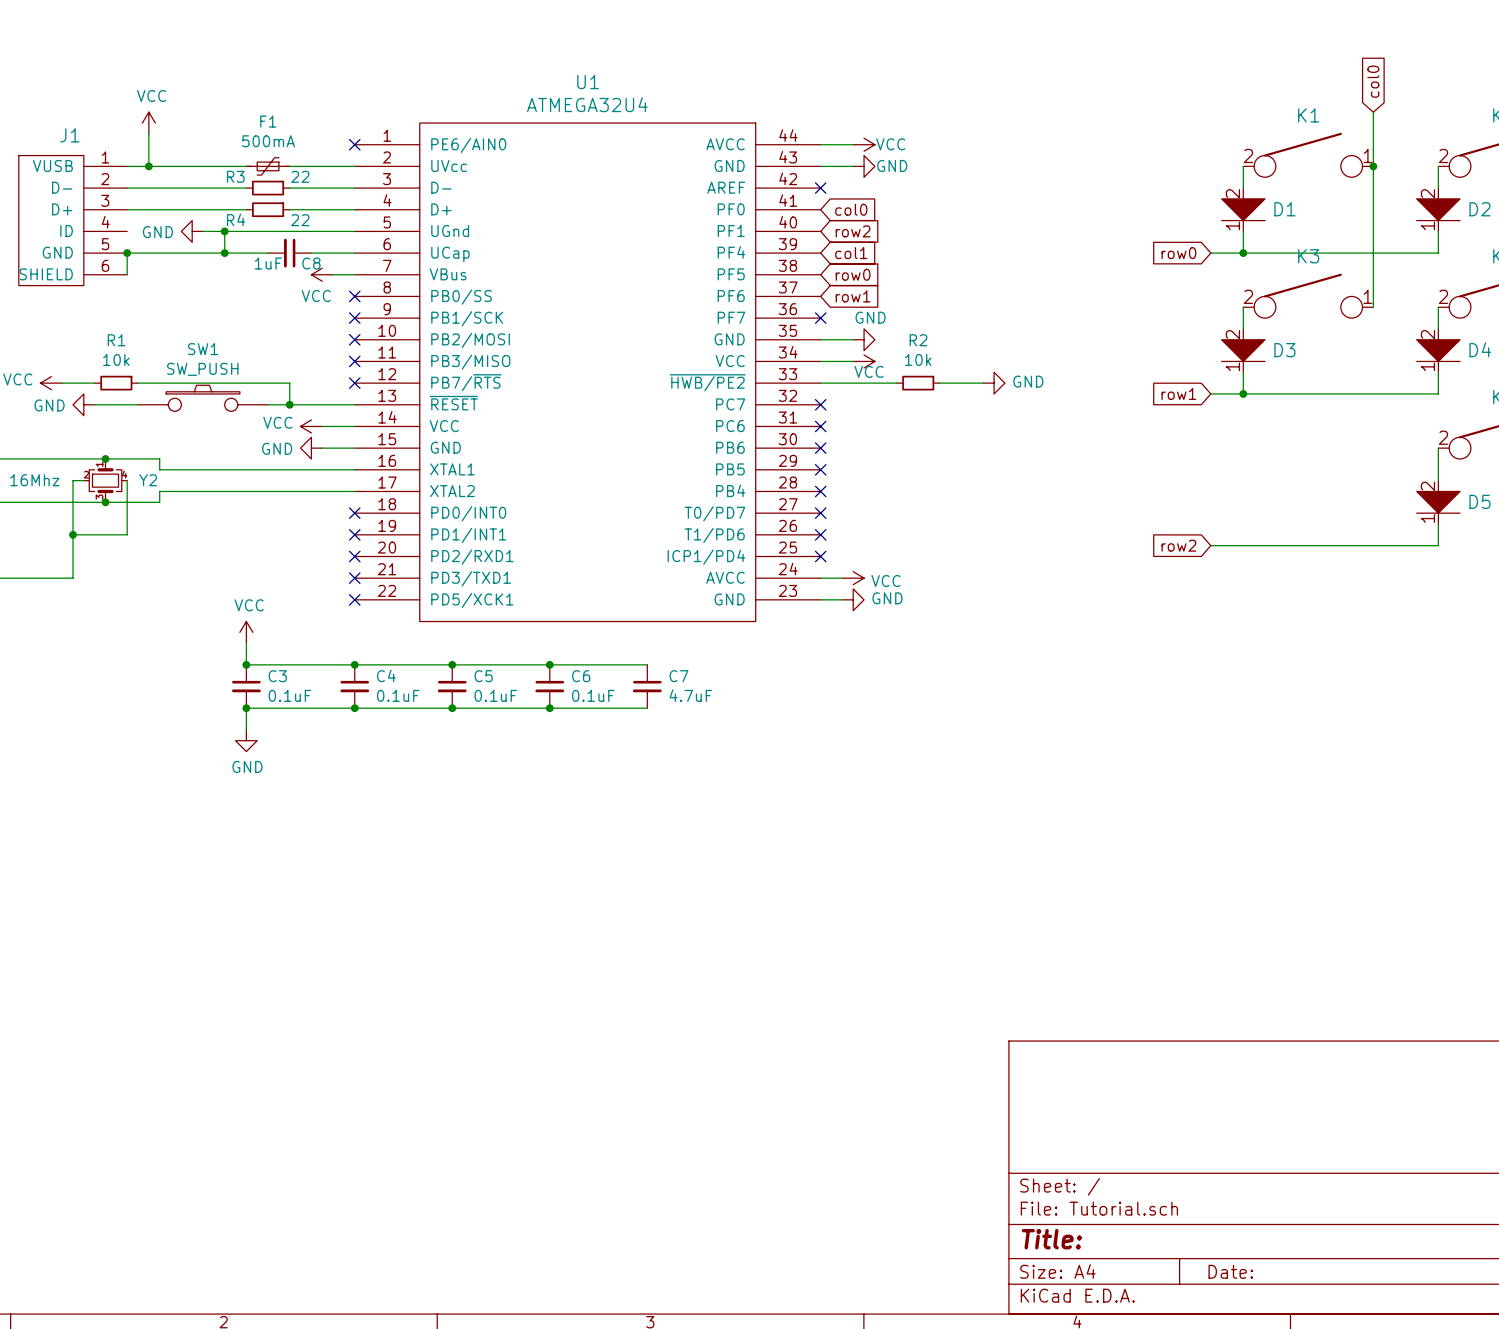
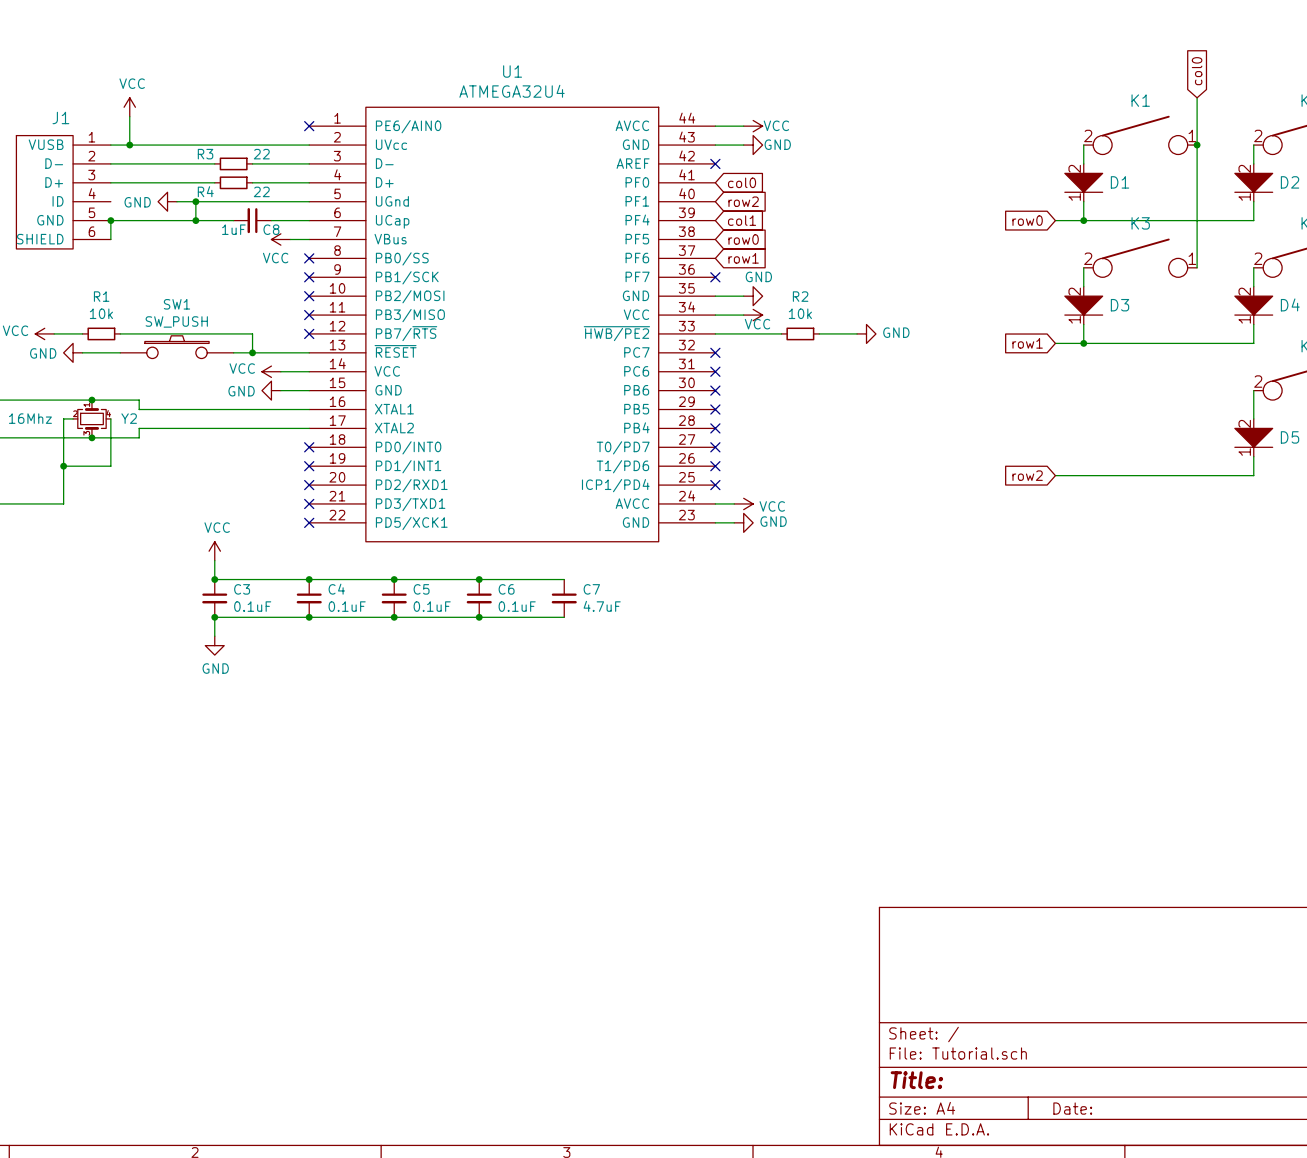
F1: 500mA (268, 166) -> none

